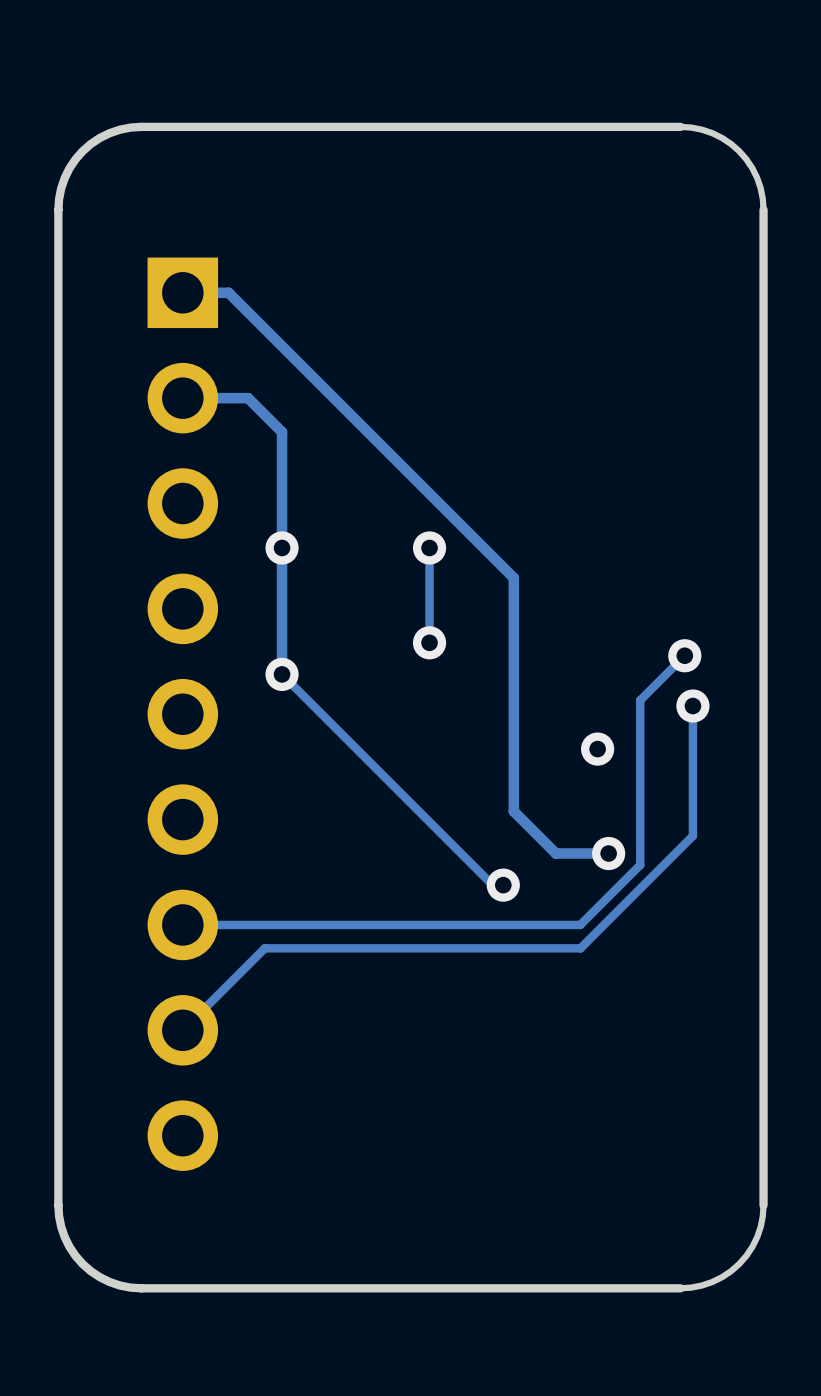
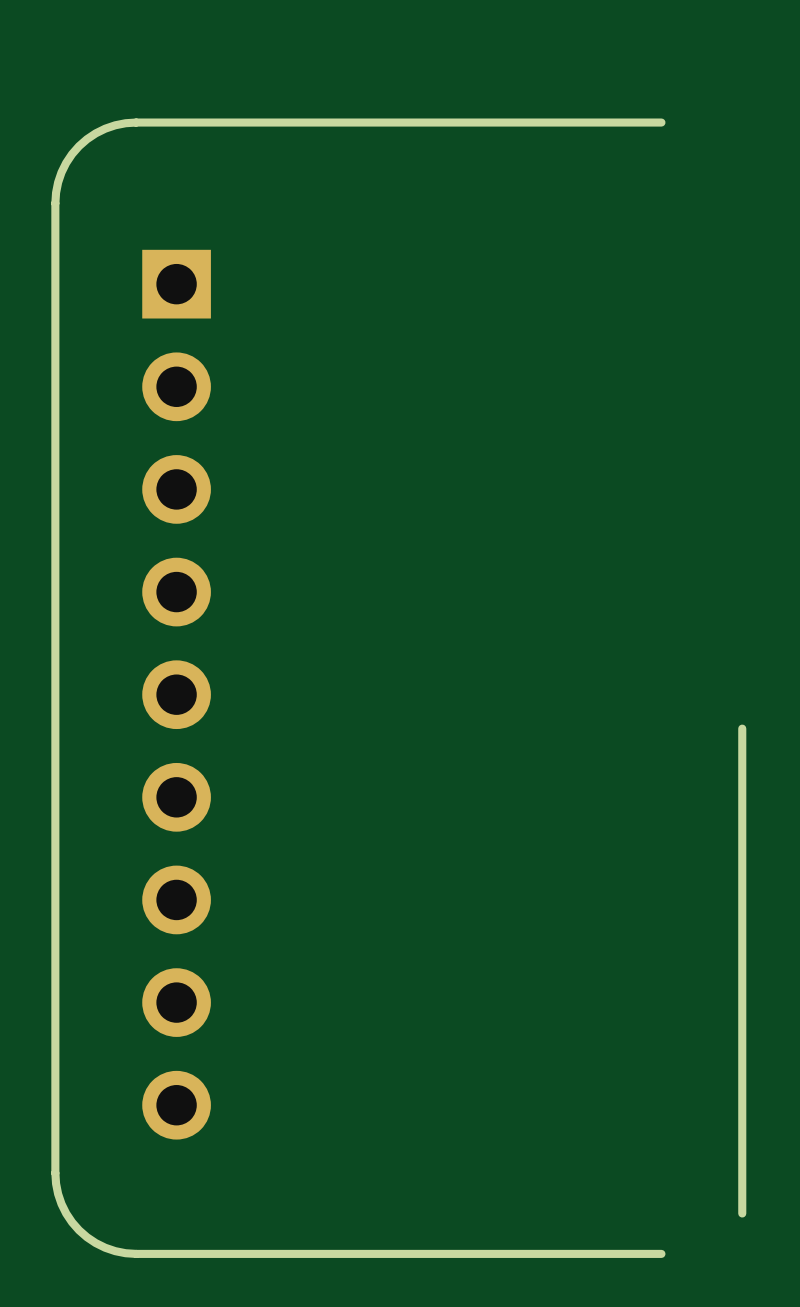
board edge: (680, 126) (702, 129) (731, 144) (752, 168) (762, 199) (763, 749) -> none
track: (182, 292) (228, 292) (513, 578) (513, 811) (555, 853) (608, 853) -> none
track: (182, 398) (248, 398) (282, 432) (282, 674) (492, 885) (503, 885) -> none
via: (282, 547) -> none
track: (429, 547) (429, 642) -> none
via: (429, 547) -> none
via: (429, 642) -> none
track: (684, 655) (640, 700) (640, 864) (580, 924) (182, 924) -> none
via: (684, 655) -> none
via: (282, 674) -> none
track: (692, 706) (692, 835) (580, 948) (264, 948) (182, 1030) -> none
via: (692, 706) -> none
via: (597, 749) -> none
via: (608, 853) -> none
via: (503, 885) -> none
board edge: (763, 1205) (757, 1237) (739, 1264) (712, 1282) (680, 1288) -> (742, 1173) (742, 1213)

